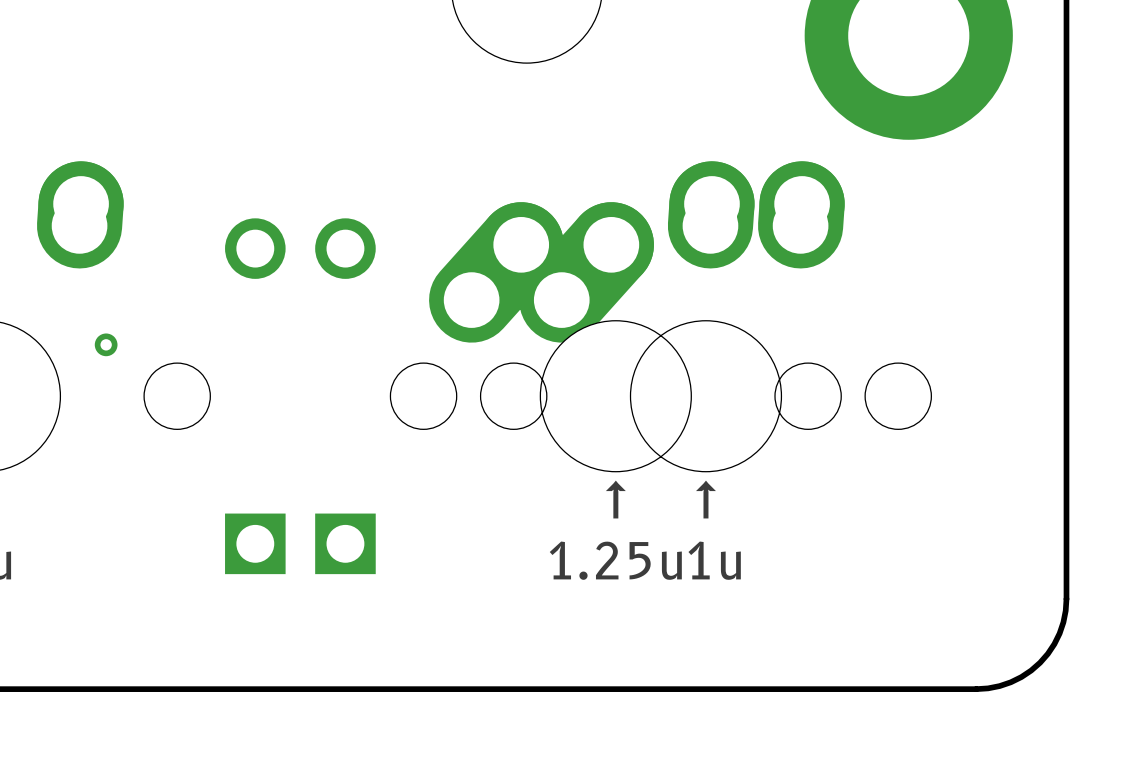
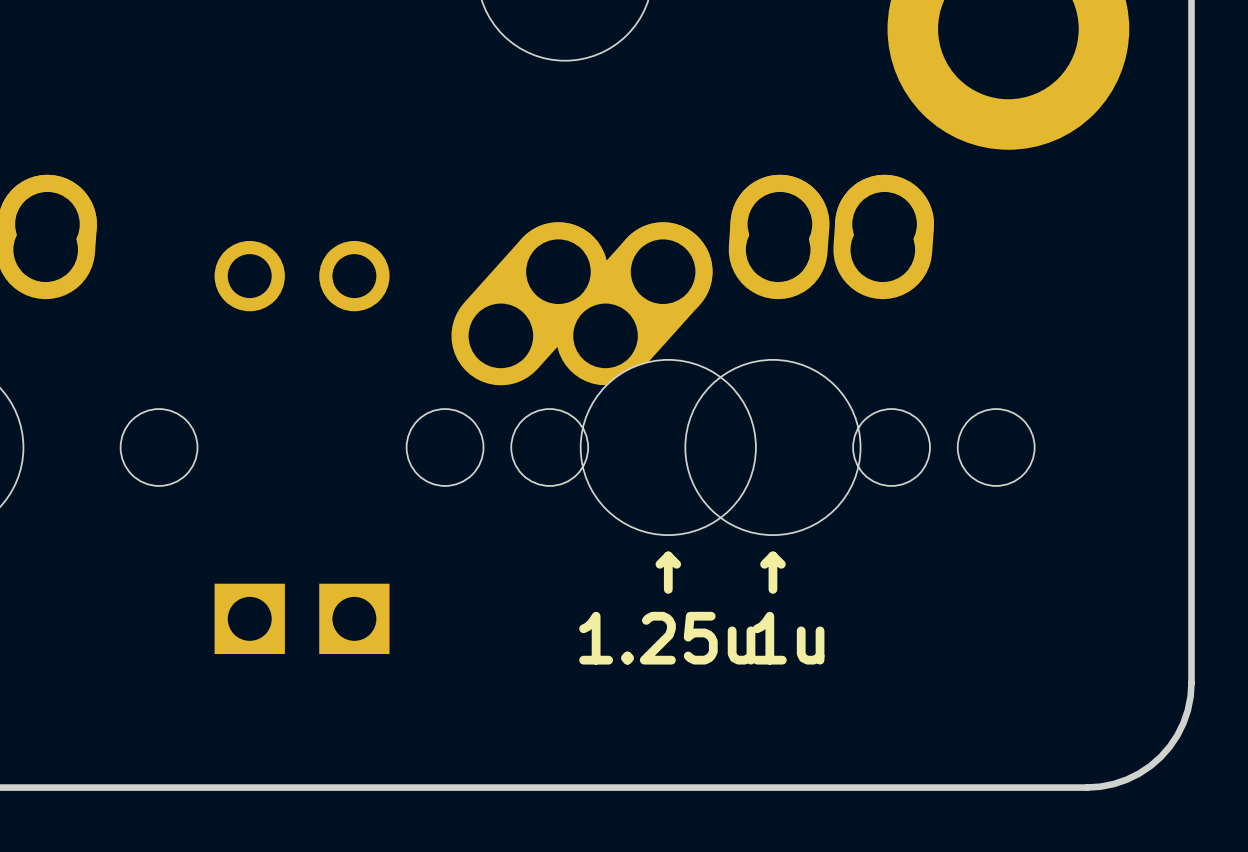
part: (106, 344) -> none

